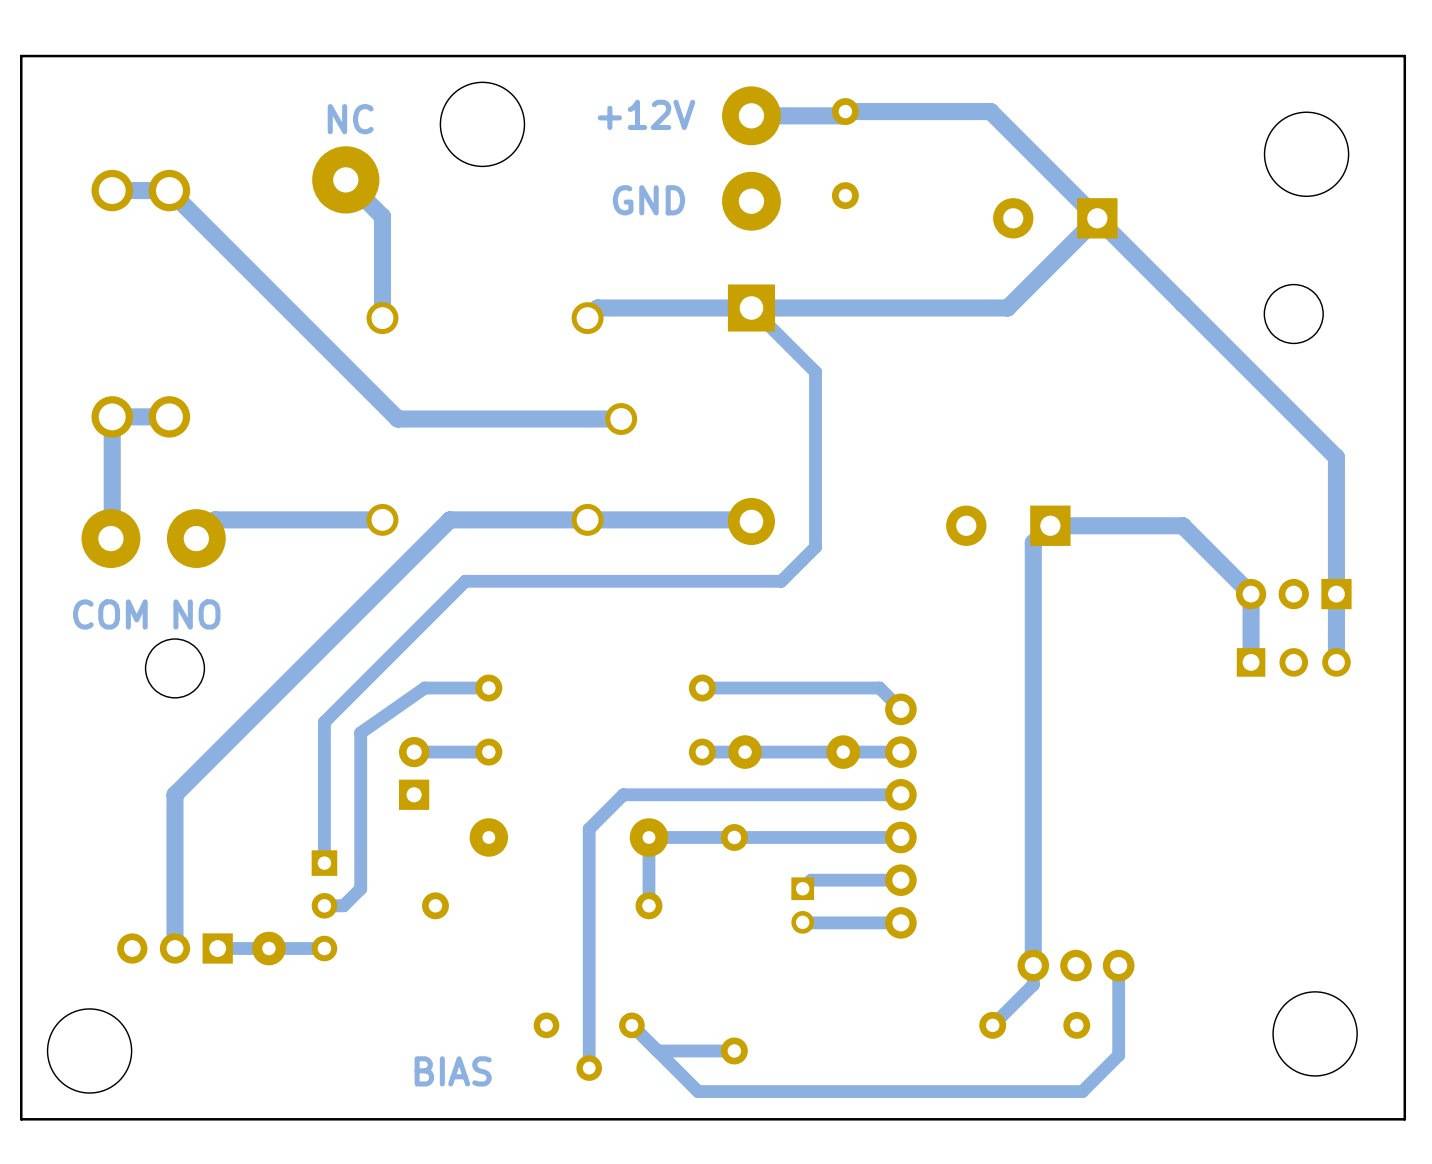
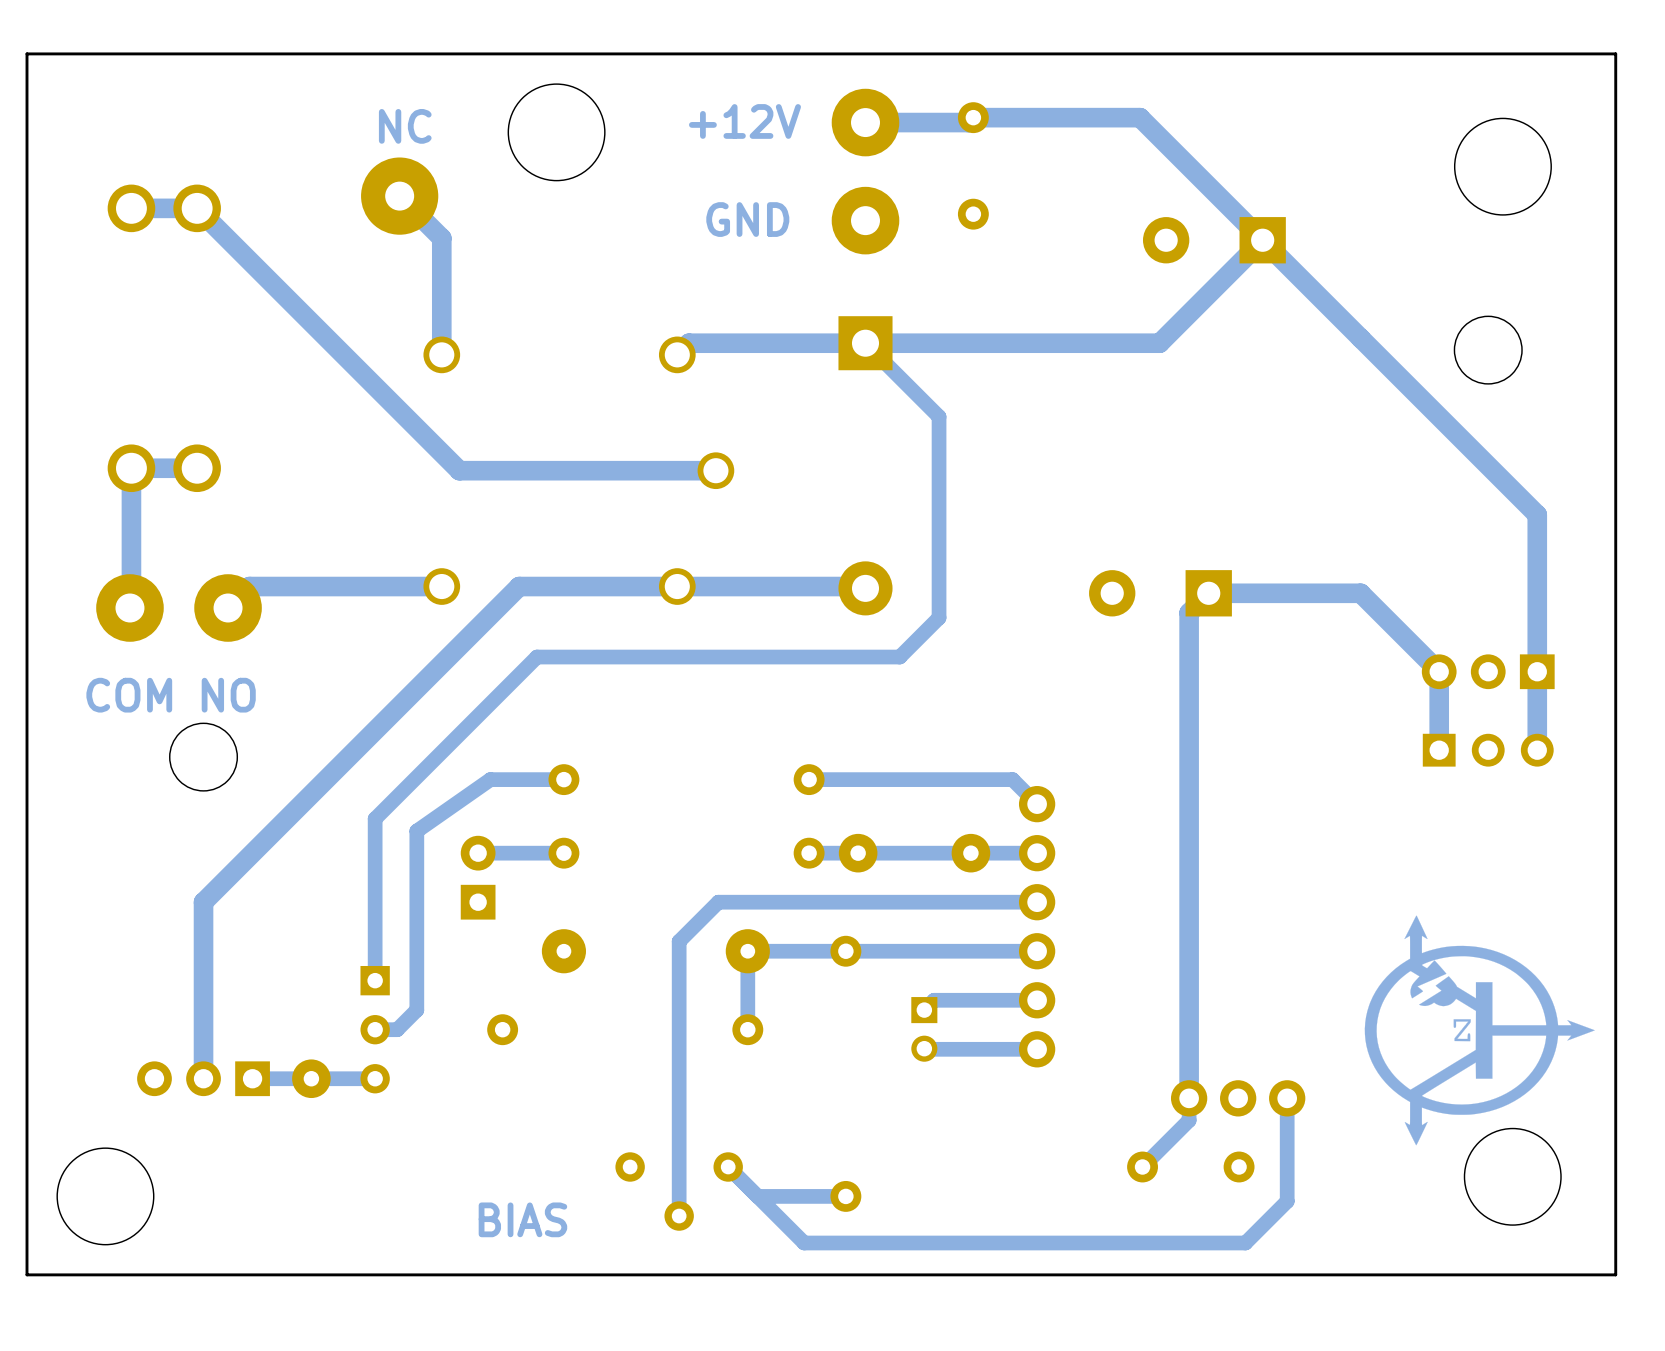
drawing: none -> [1364, 915, 1595, 1146]

